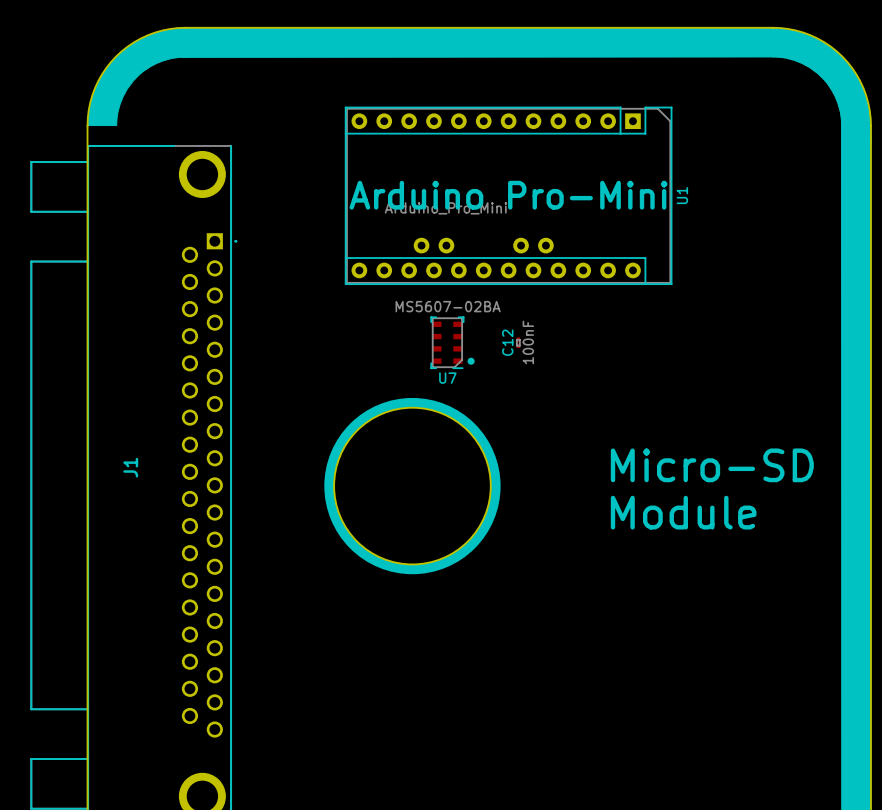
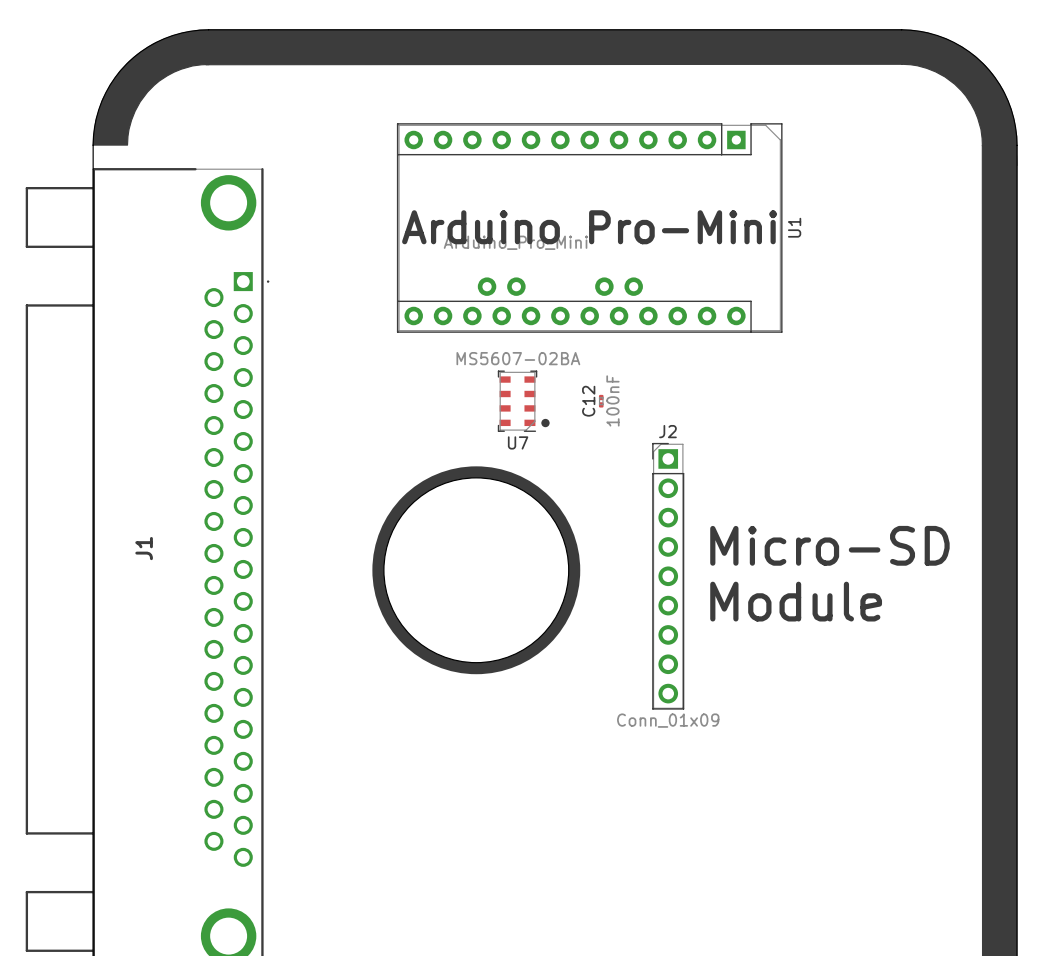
J2: none -> Conn_01x09 (668, 576)

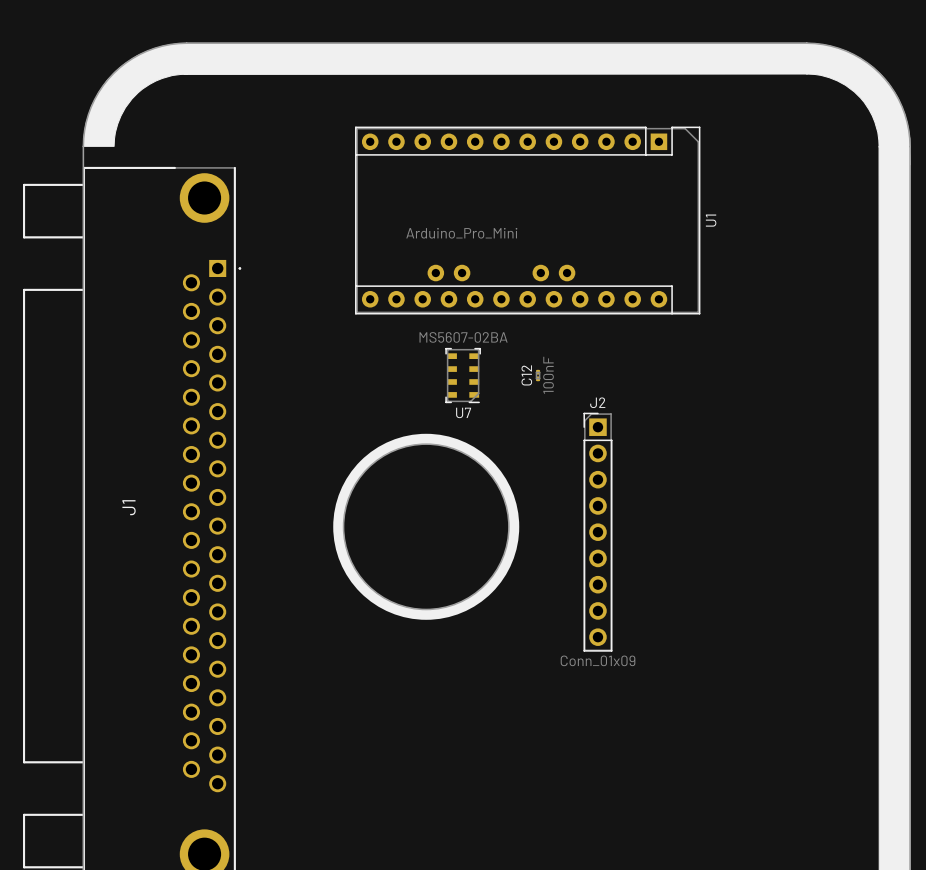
text: Arduino Pro-Mini (589, 227) -> none
drawing: [541, 418, 550, 428] -> none
text: Micro-SD (829, 545) -> none
text: Module (796, 601) -> none

